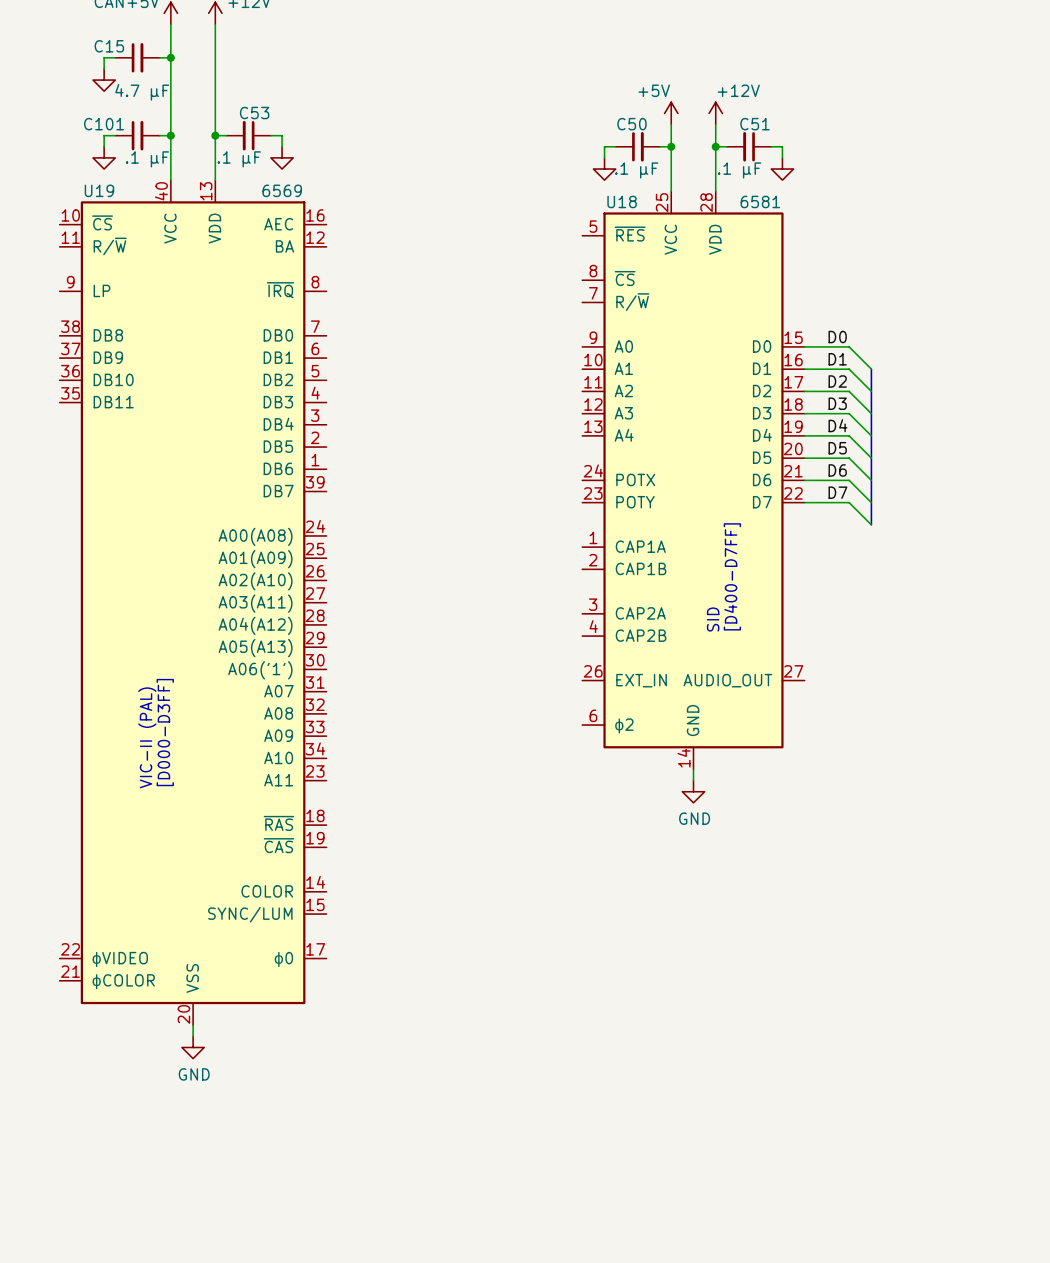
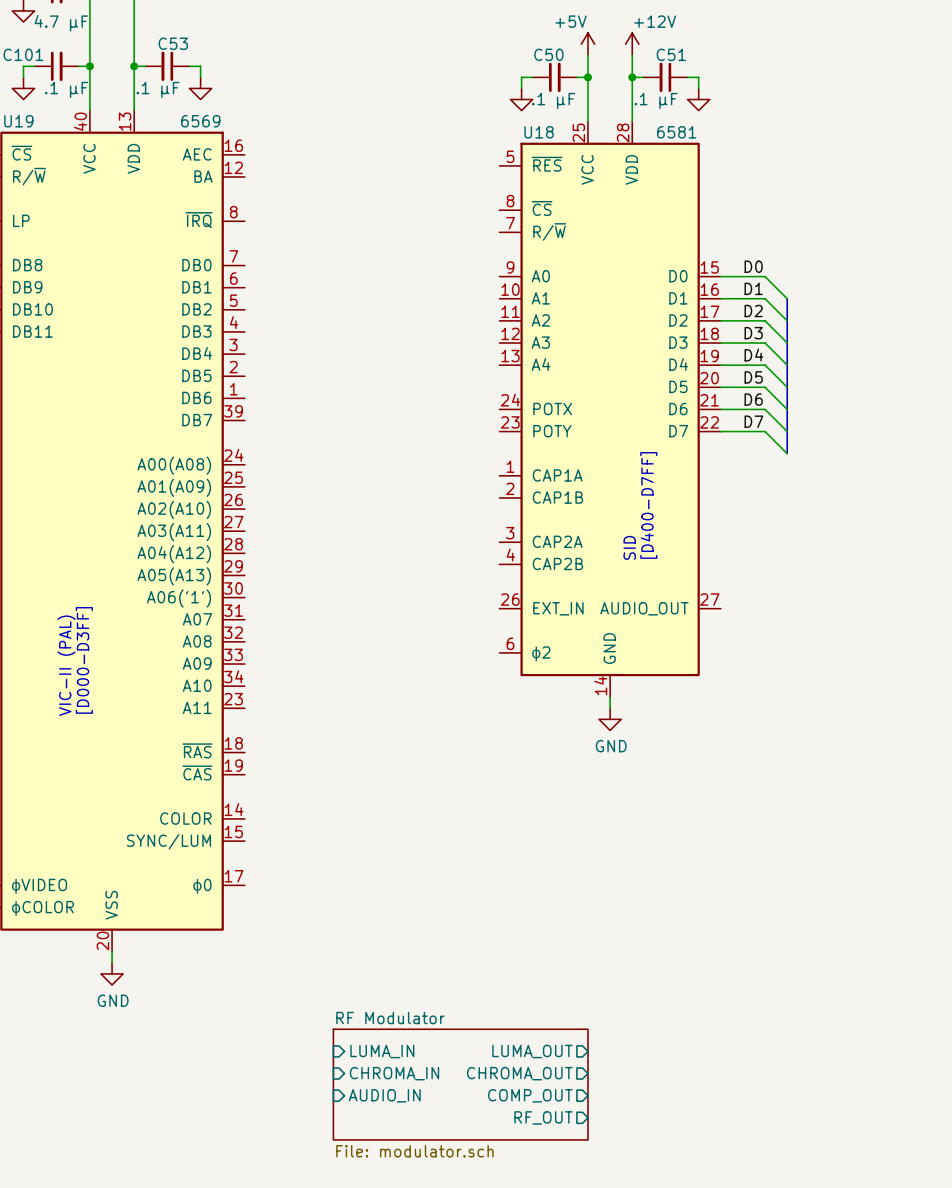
sheet pin: none -> LUMA_IN (382, 1051)
sheet pin: none -> LUMA_OUT (532, 1051)
sheet pin: none -> CHROMA_IN (394, 1073)
sheet pin: none -> CHROMA_OUT (519, 1073)
sheet RF Modulator: none -> File: modulator.sch (460, 1084)
sheet pin: none -> AUDIO_IN (384, 1095)
sheet pin: none -> COMP_OUT (530, 1095)
sheet pin: none -> RF_OUT (543, 1117)

